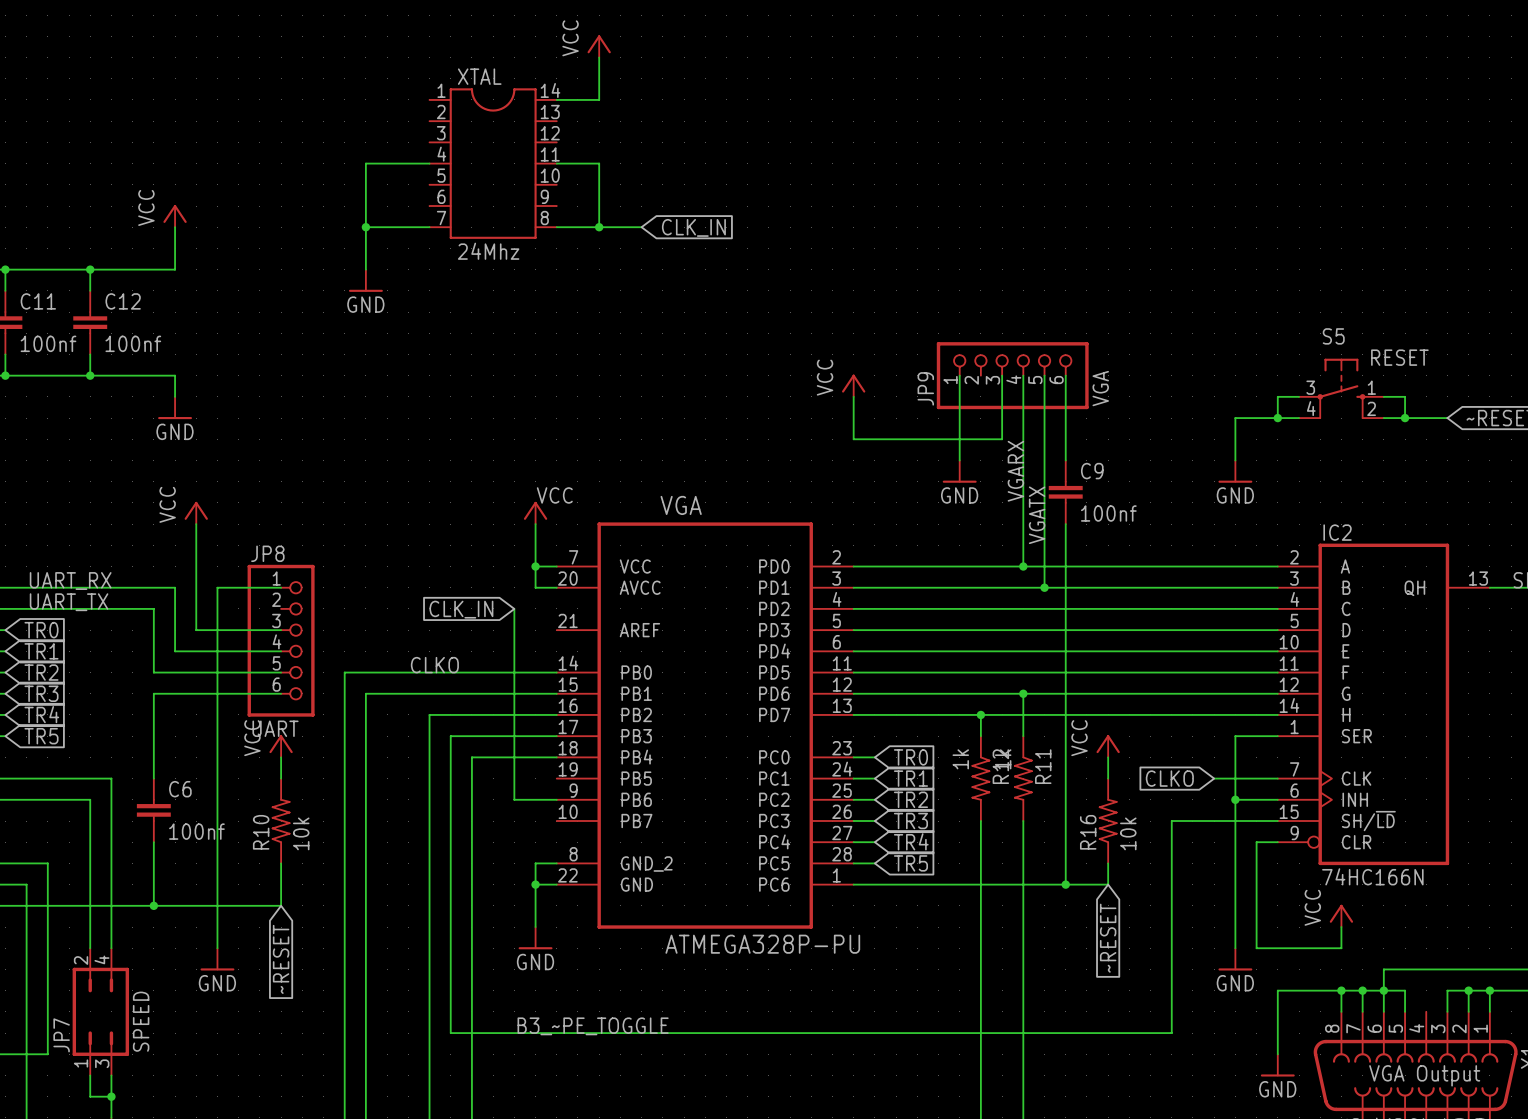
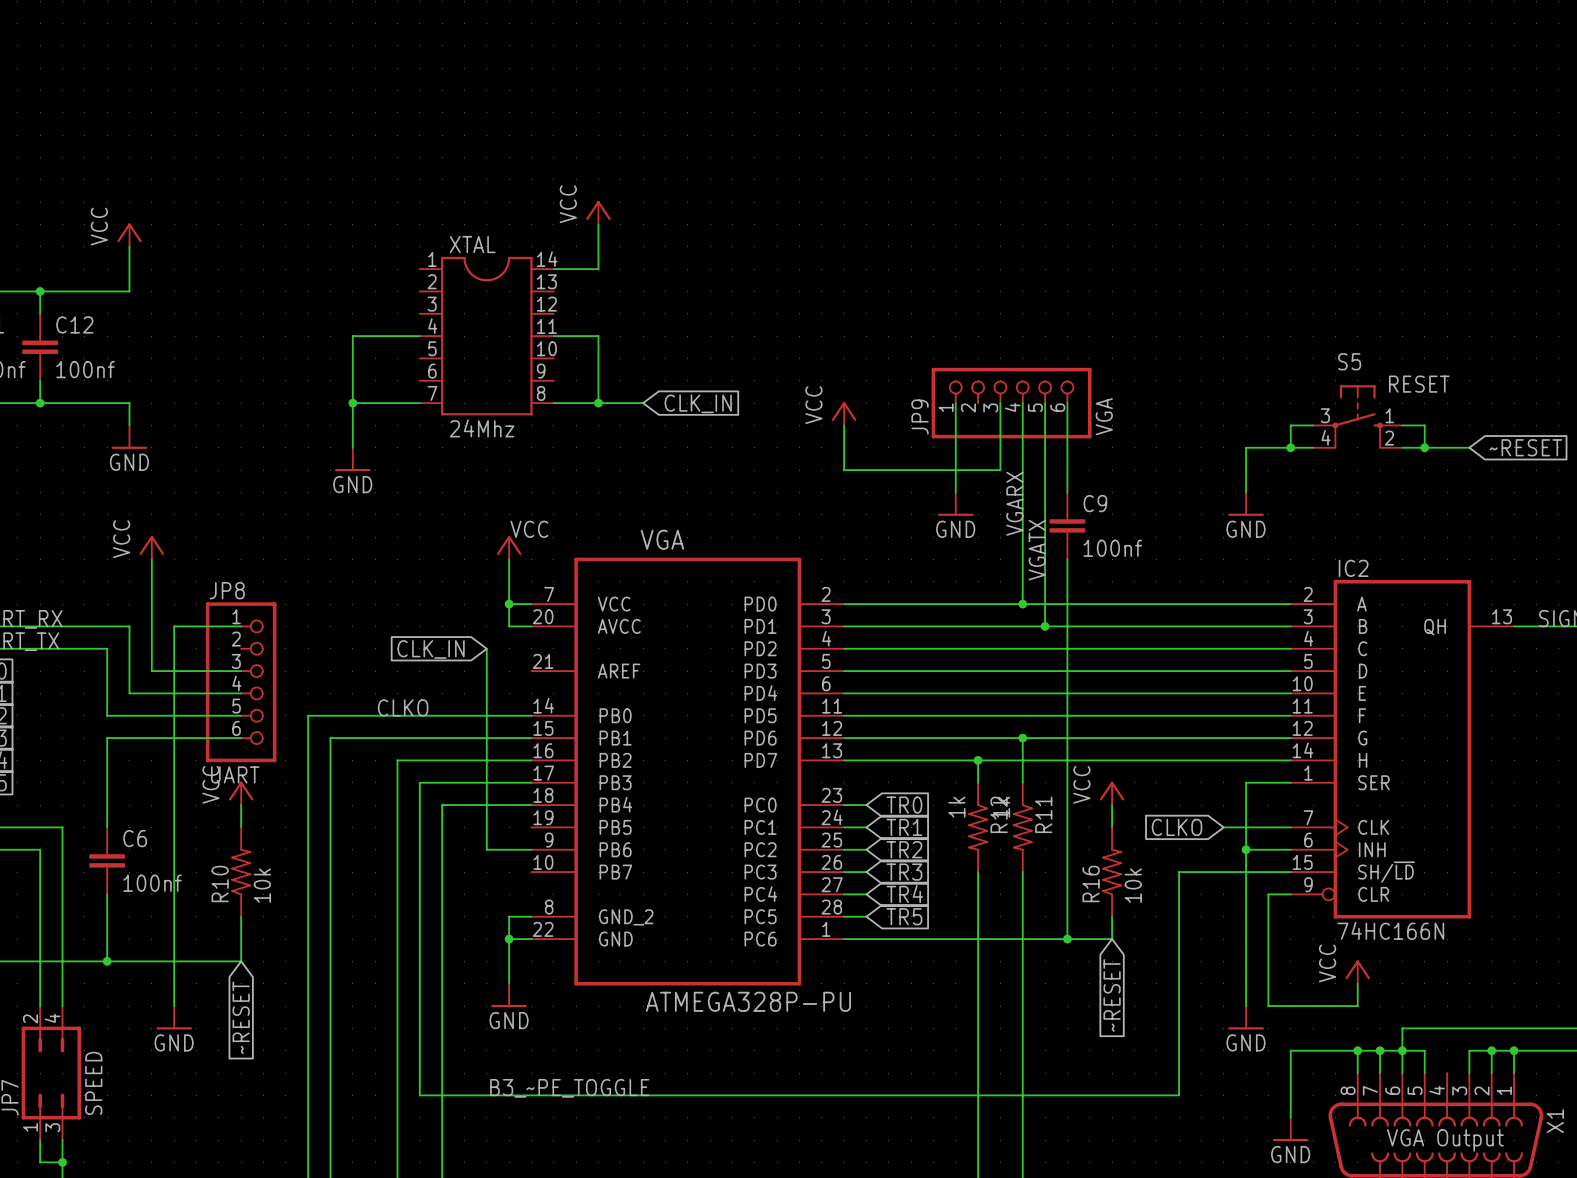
power symbol position: VCC (599, 46) -> VCC (598, 212)
wire: (599, 57) (599, 99) (556, 99) -> (598, 224) (598, 269) (553, 269)
wire: (429, 163) (365, 163) (365, 269) -> (419, 336) (352, 336) (352, 447)
XTAL position: (493, 163) -> (486, 336)
wire: (556, 163) (599, 163) (599, 227) -> (553, 336) (598, 336) (598, 403)
wire: (365, 227) (429, 227) -> (352, 403) (419, 403)
junction: (365, 227) -> none
wire: (556, 227) (641, 227) -> (553, 403) (643, 403)
junction: (599, 227) -> none
global label position: CLK_IN (693, 227) -> CLK_IN (698, 403)
power symbol position: GND (365, 280) -> GND (352, 459)
junction: none -> (352, 403)
junction: none -> (598, 403)

